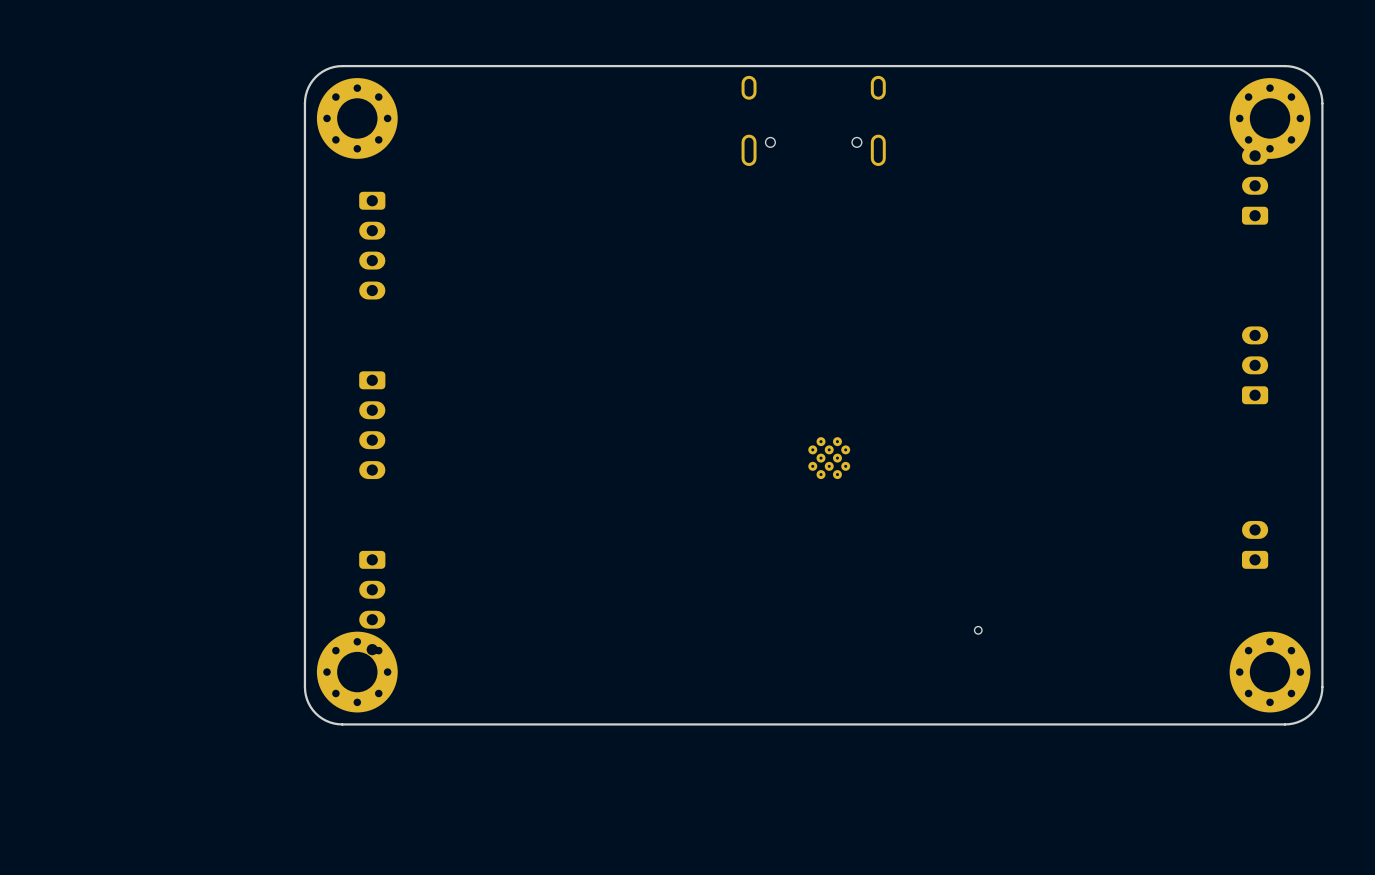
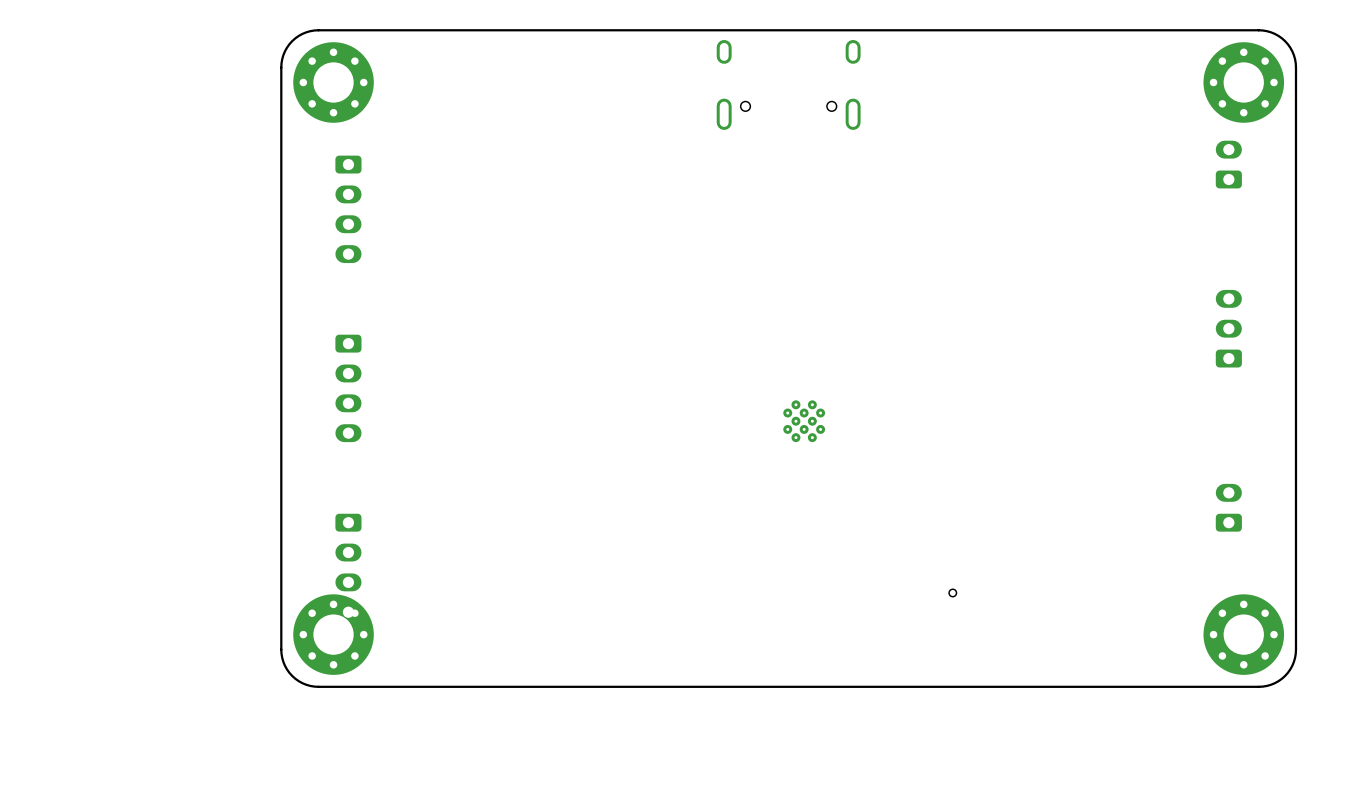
part footprint: [1241, 146, 1269, 225] -> [1215, 140, 1242, 189]

